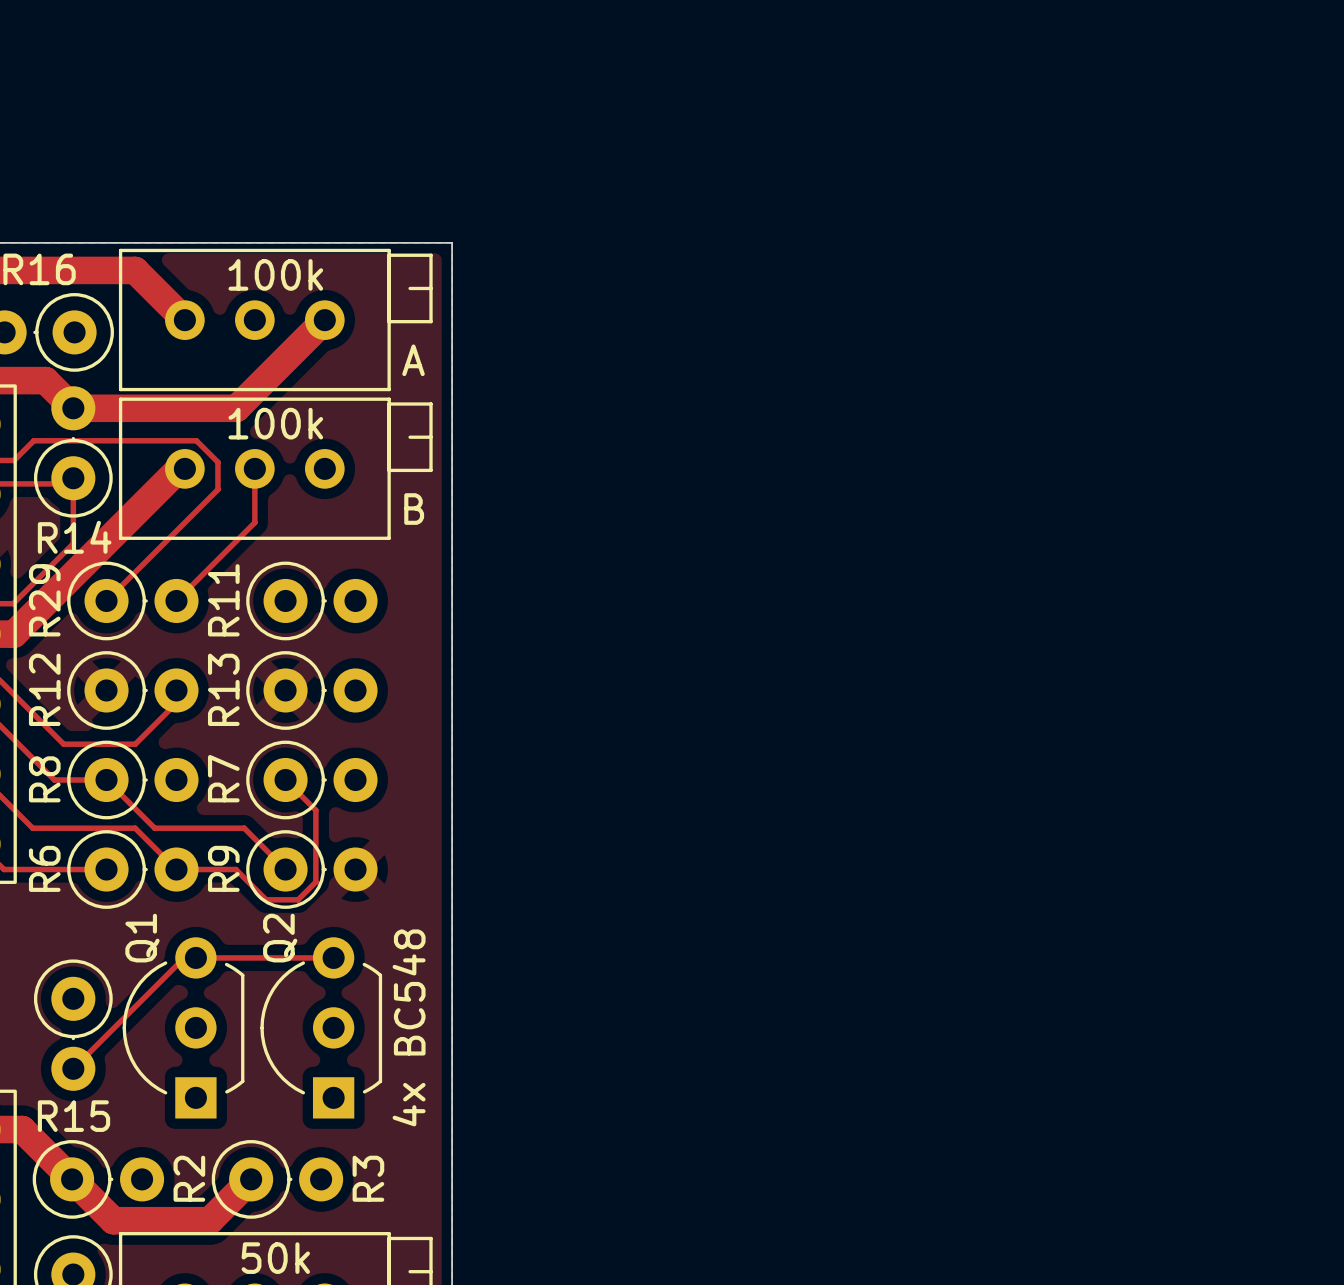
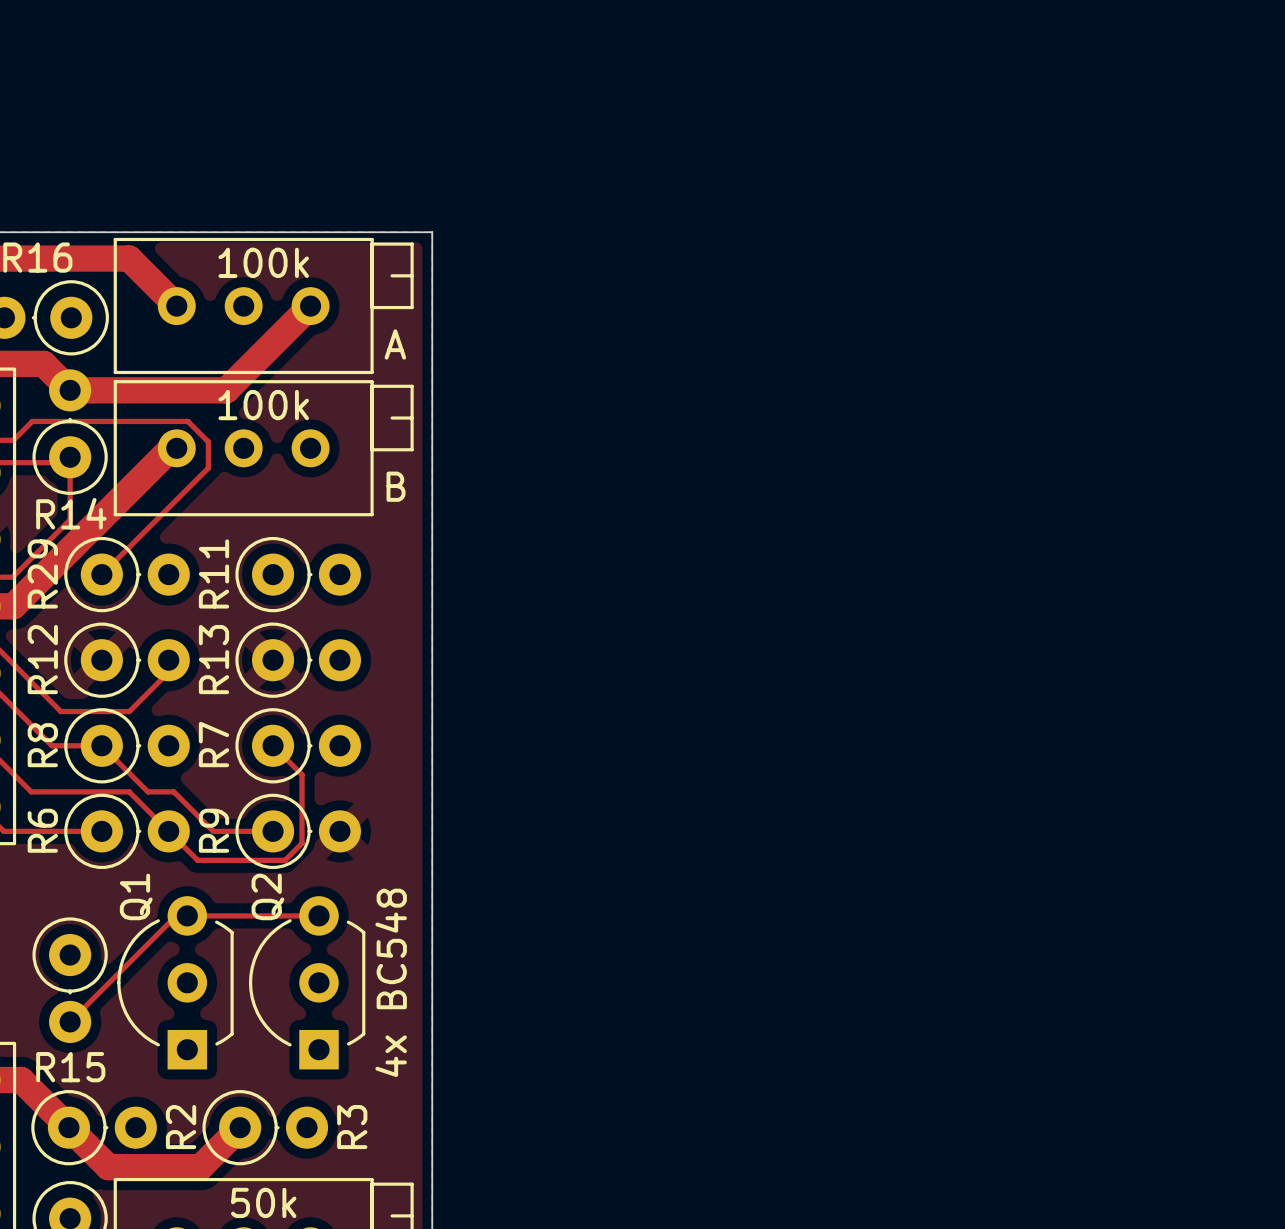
track: (254, 468) (254, 522) (176, 600) -> none
track: (181, 828) (244, 828) (285, 869) -> none
track: (176, 869) (223, 869) -> (173, 791) (213, 831)
track: none -> (168, 831) (197, 860) (254, 860)
track: (235, 869) (266, 899) -> (225, 831) (273, 831)

